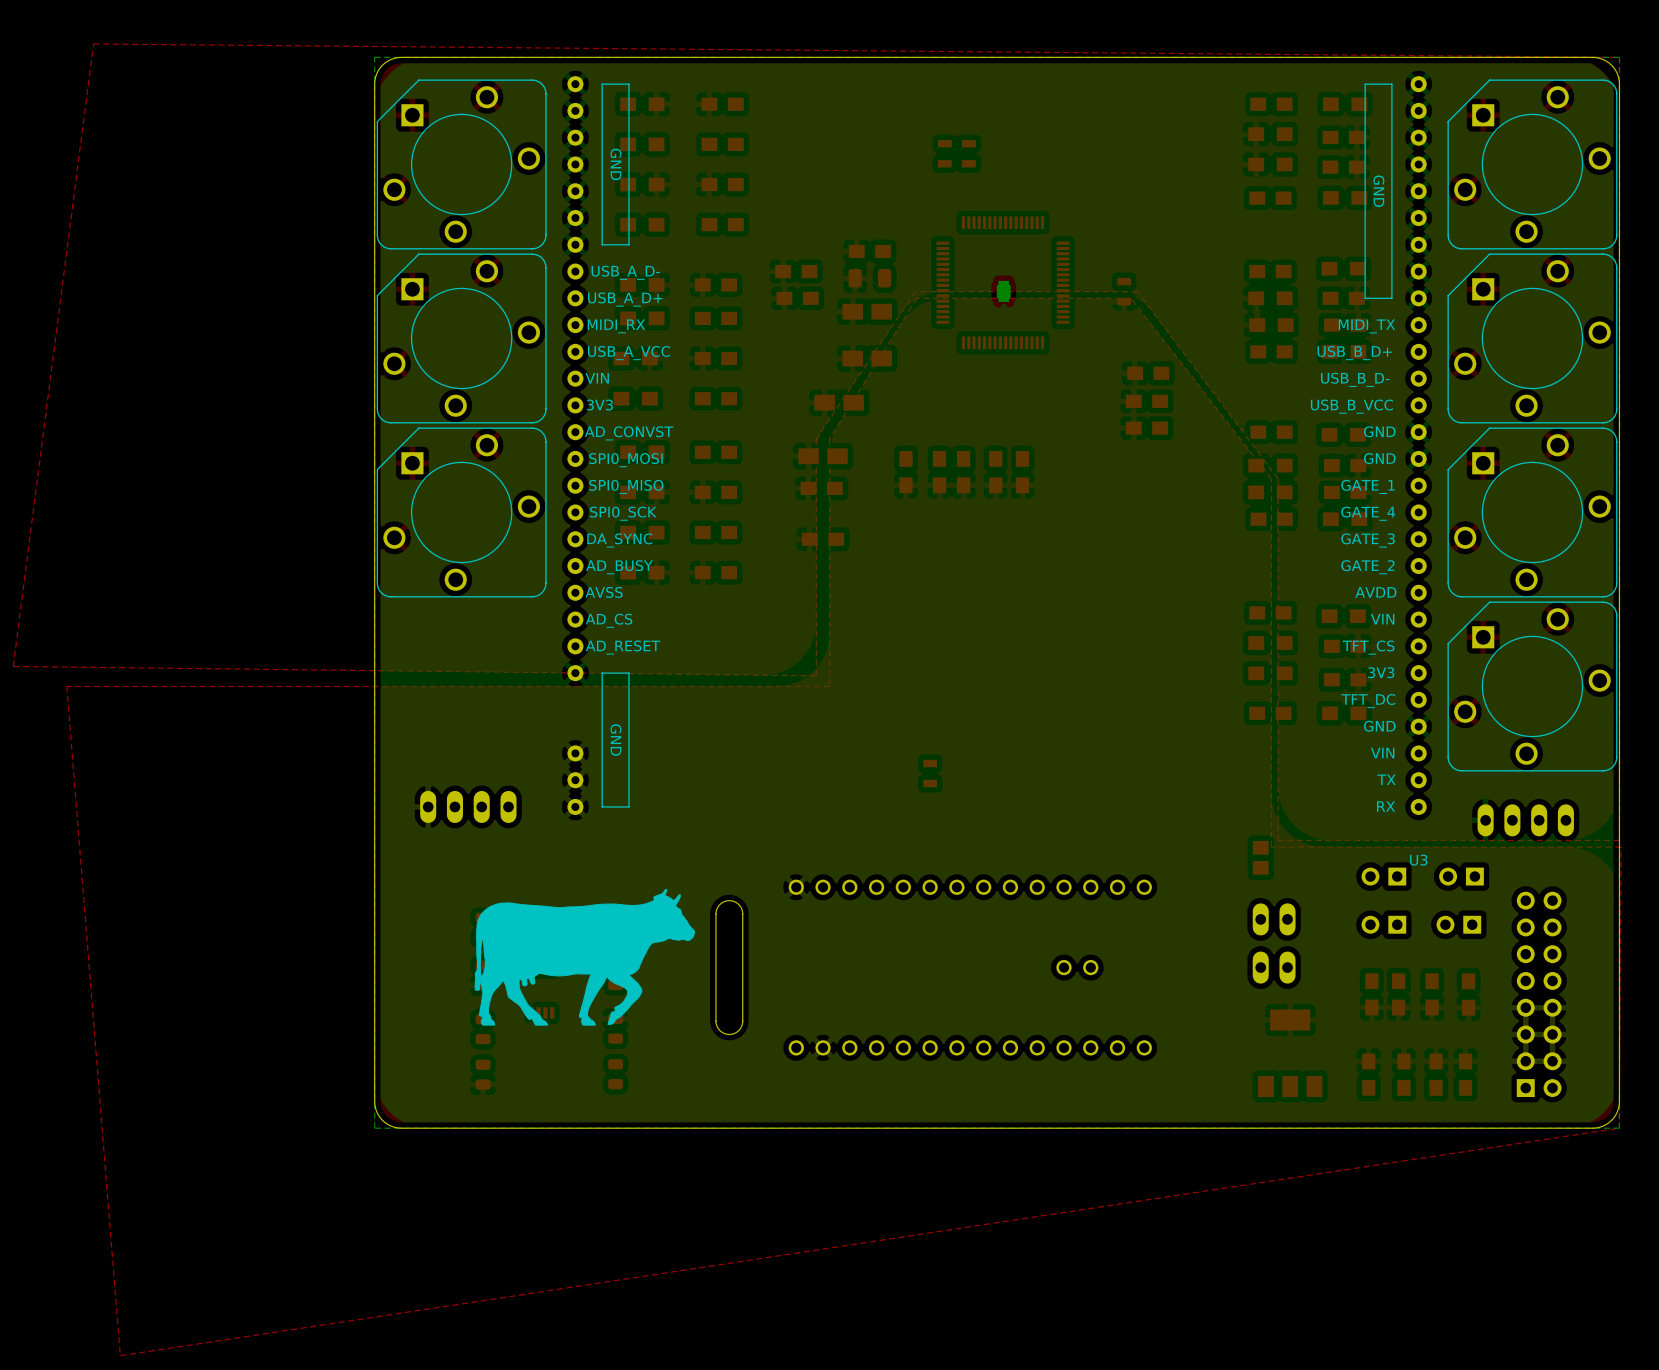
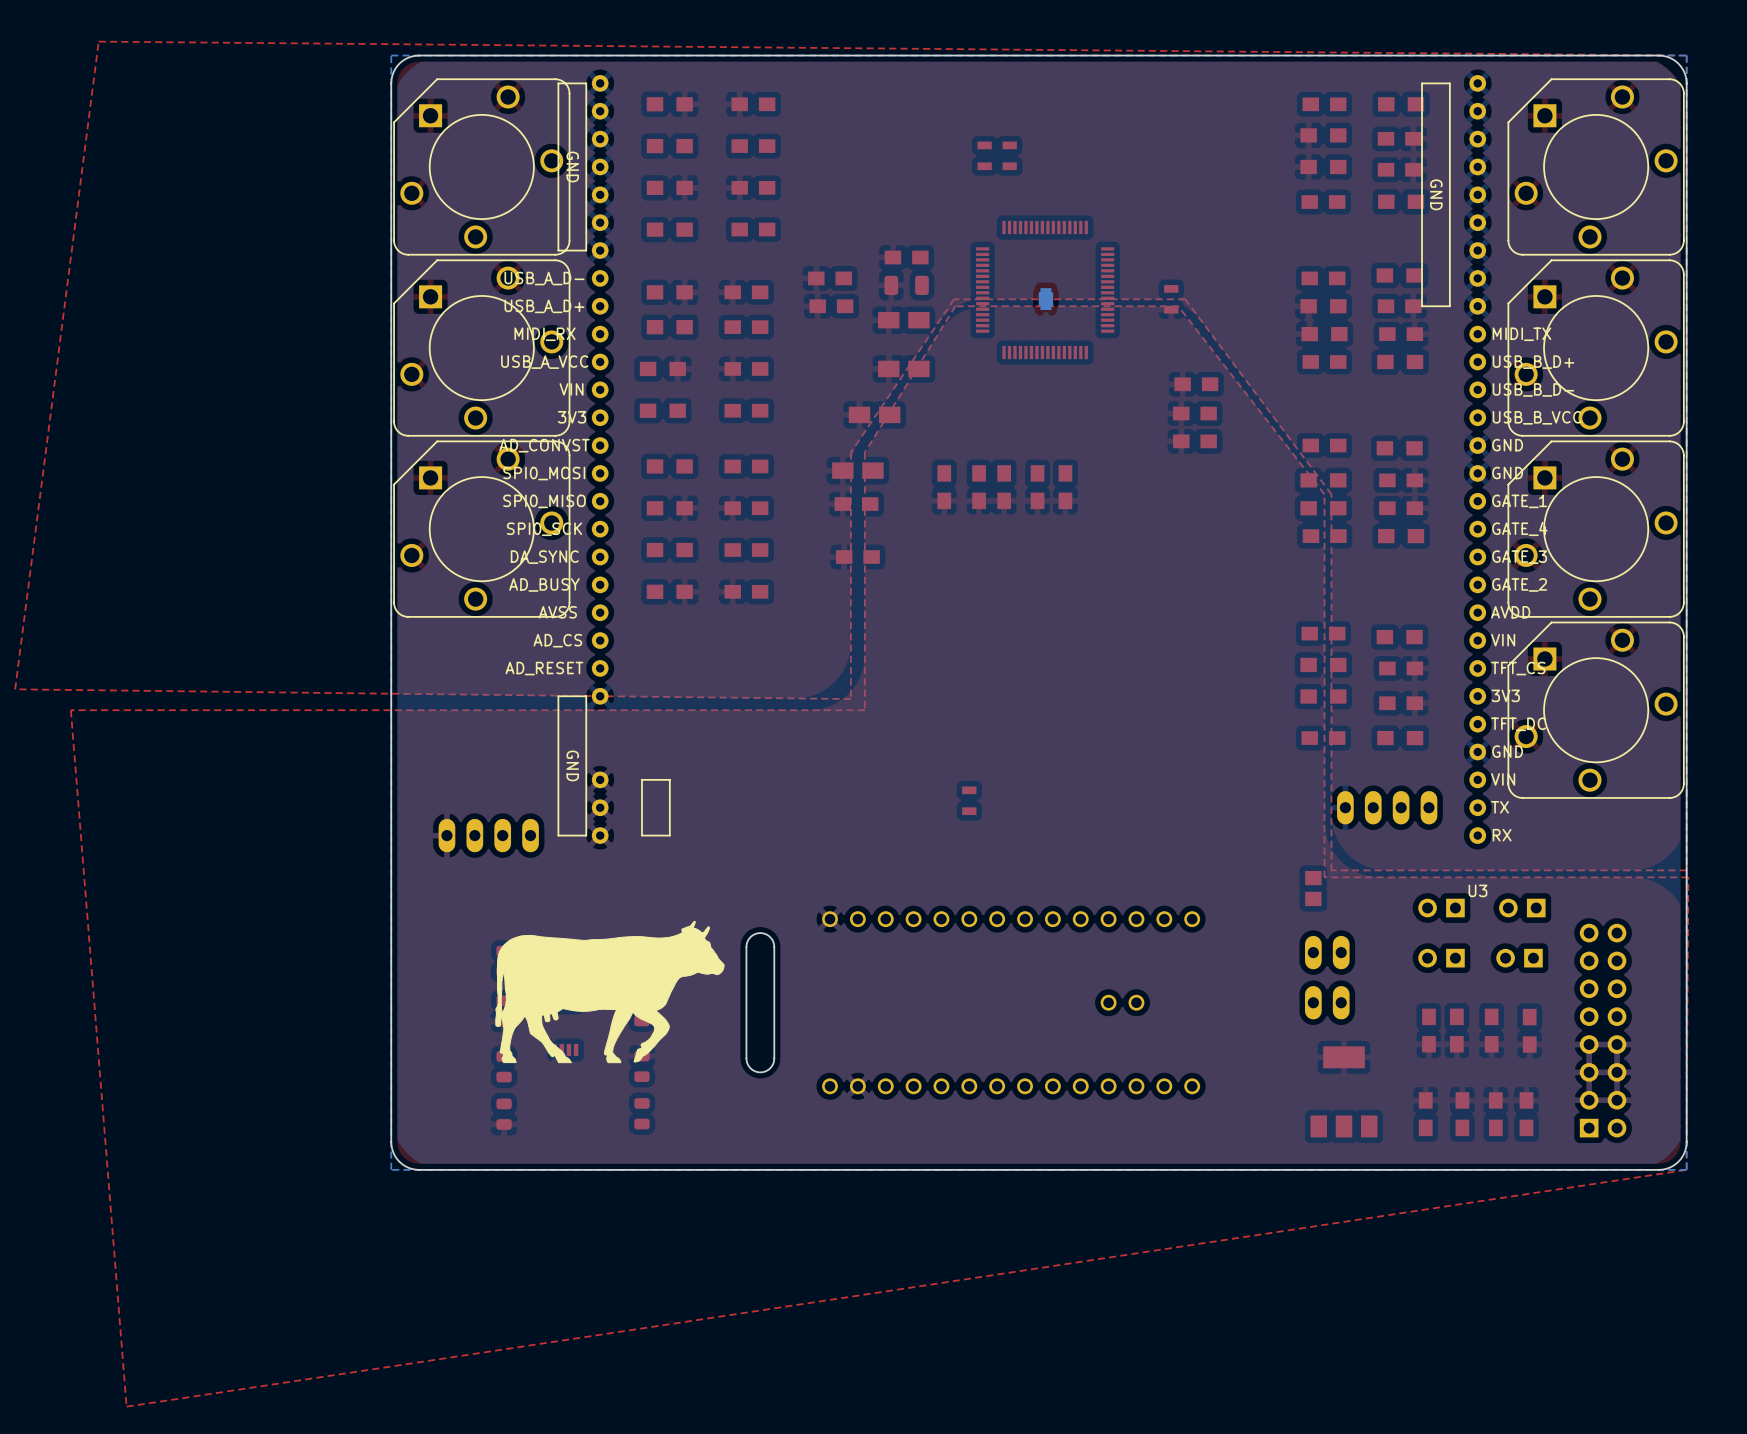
U3 footprint: [567, 76, 1427, 815] -> [557, 75, 1487, 844]
part position: (1525, 820) -> (1387, 807)

